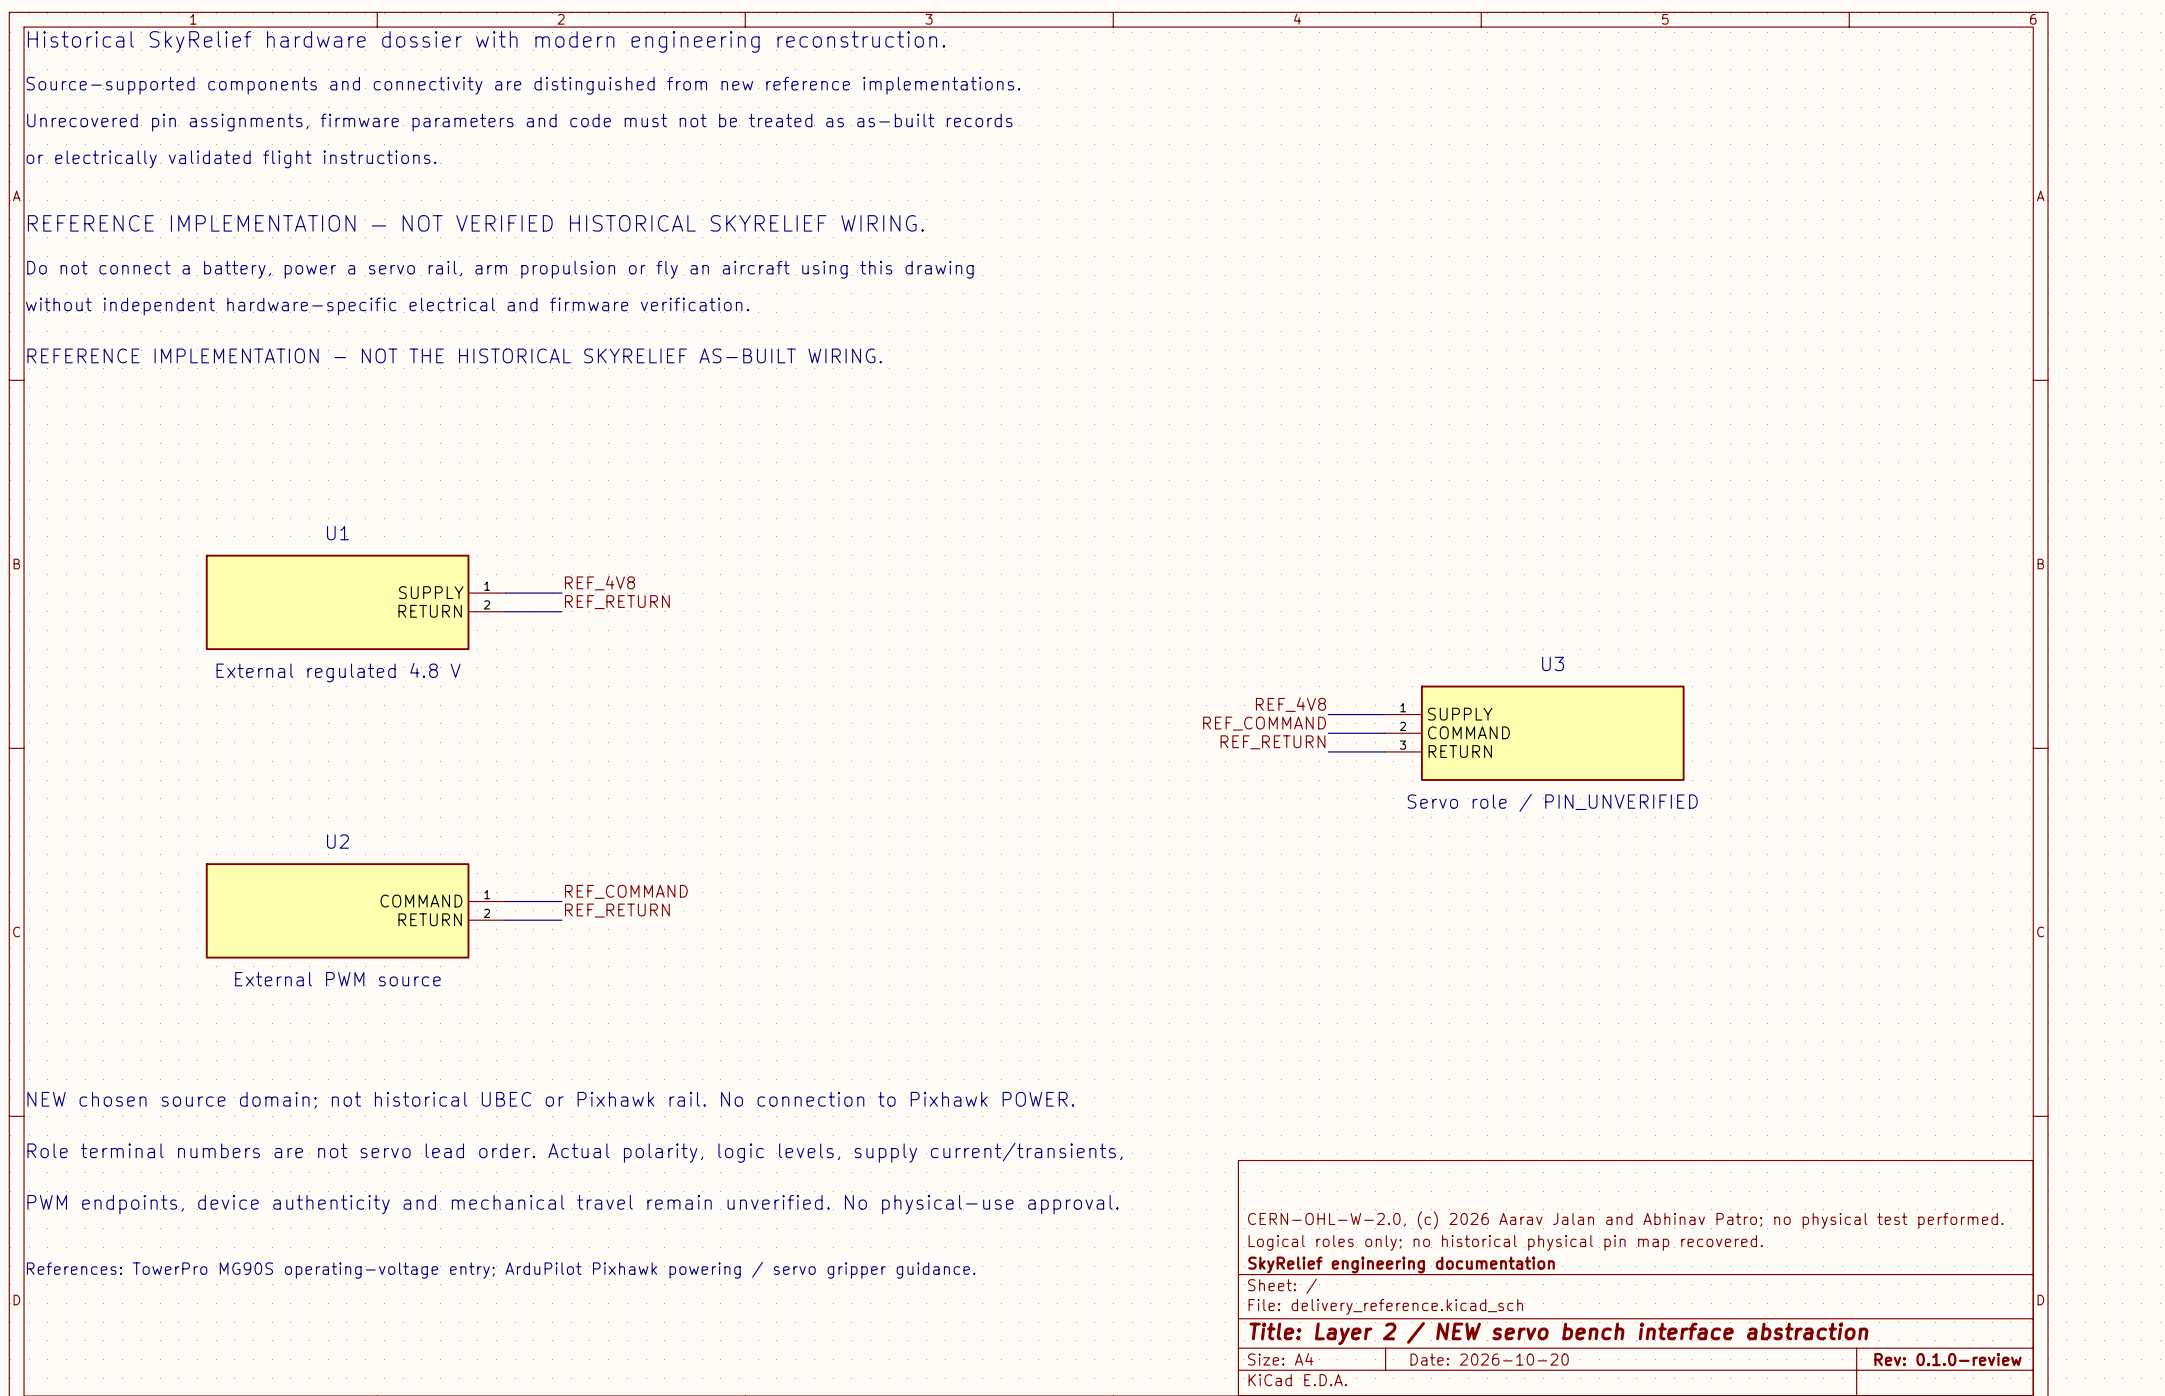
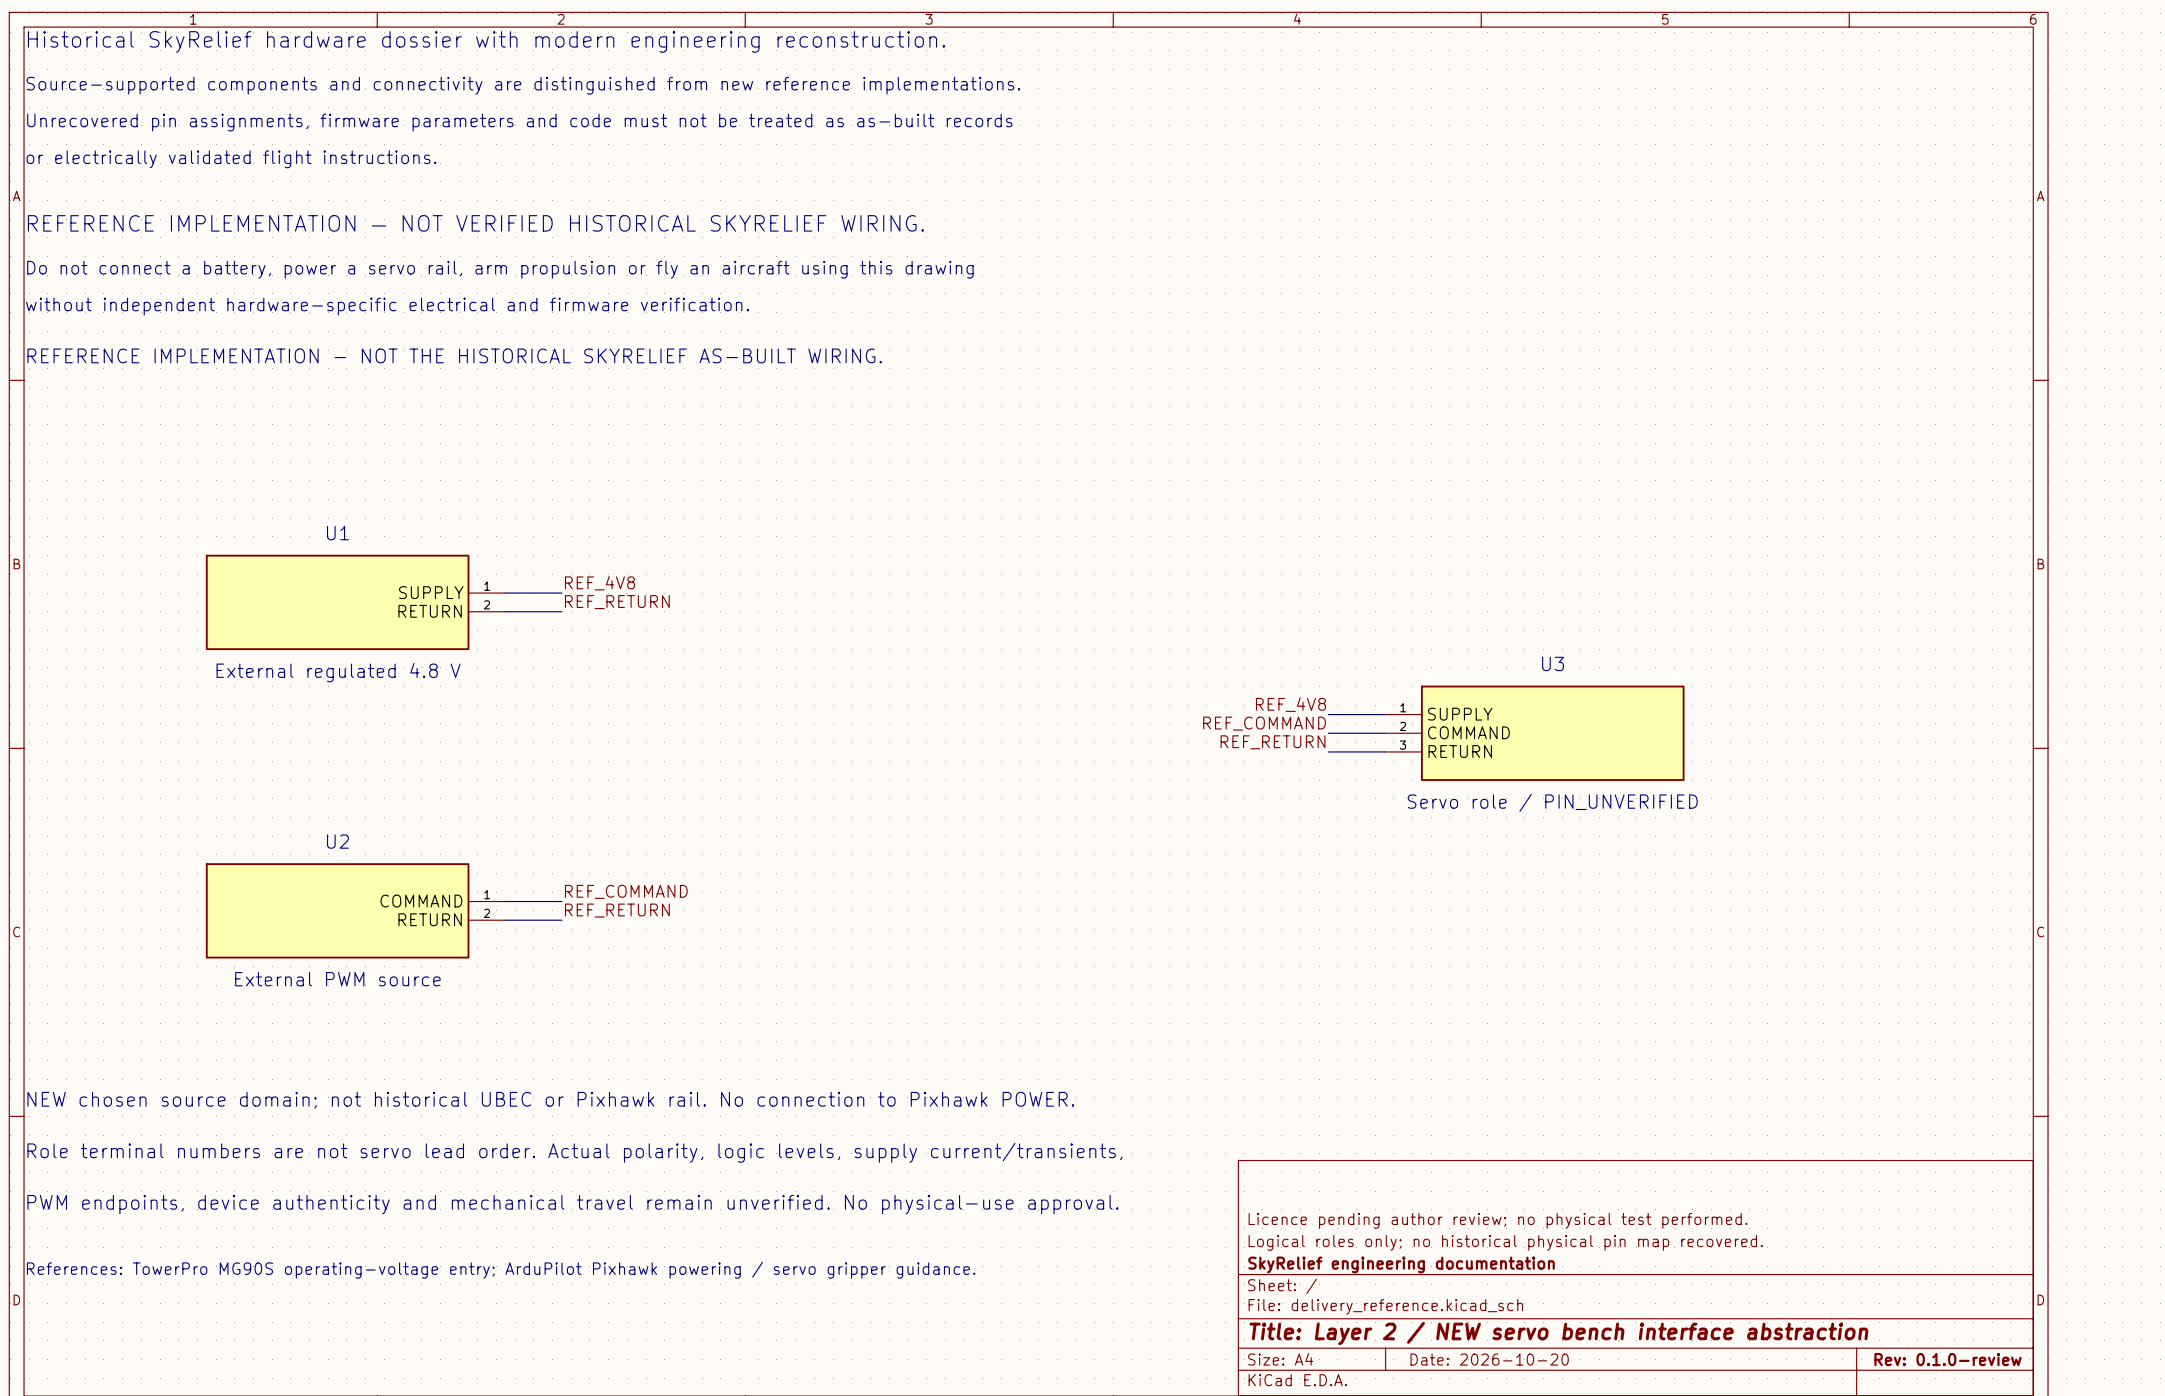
title block: CERN-OHL-W-2.0, (c) 2026 Aarav Jalan and Abhinav Patro; no physical test performed. (1625, 1220) -> Licence pending author review; no physical test performed. (1498, 1220)

